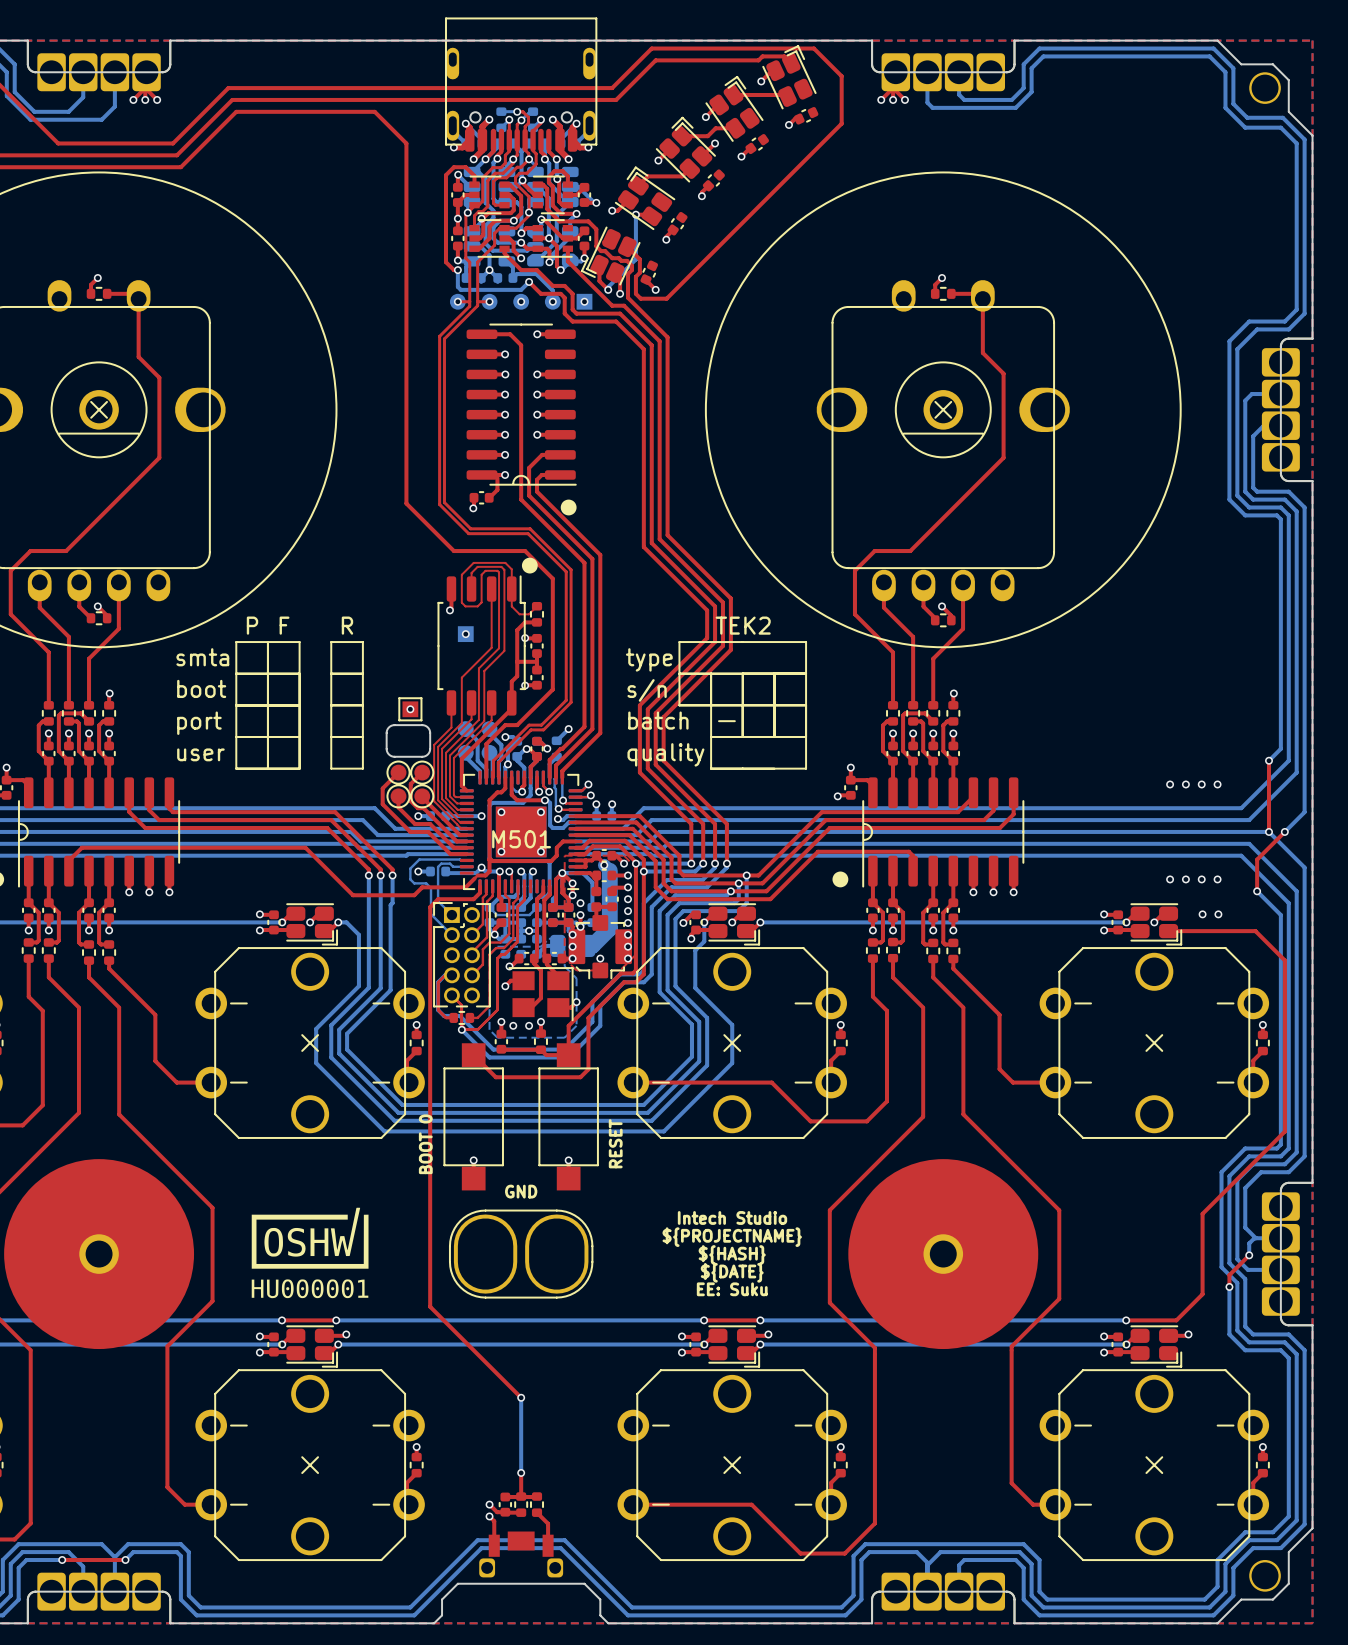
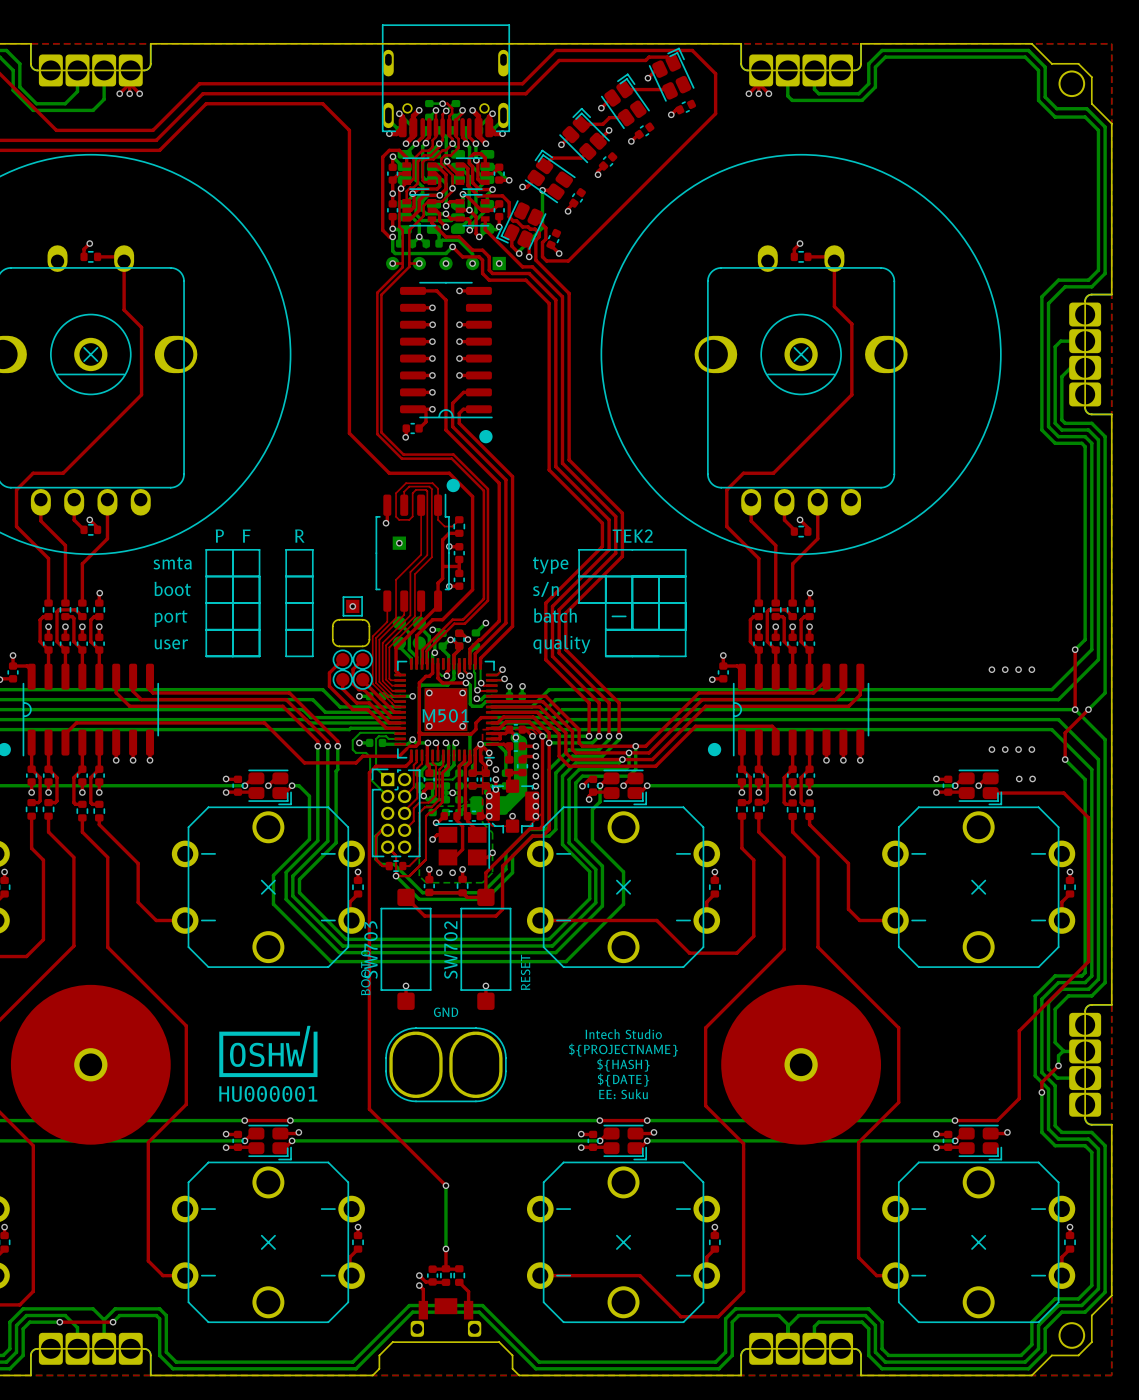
part: (473, 1116) -> none
SW703: none -> (406, 949)
part: (568, 1116) -> none
SW702: none -> (485, 949)

